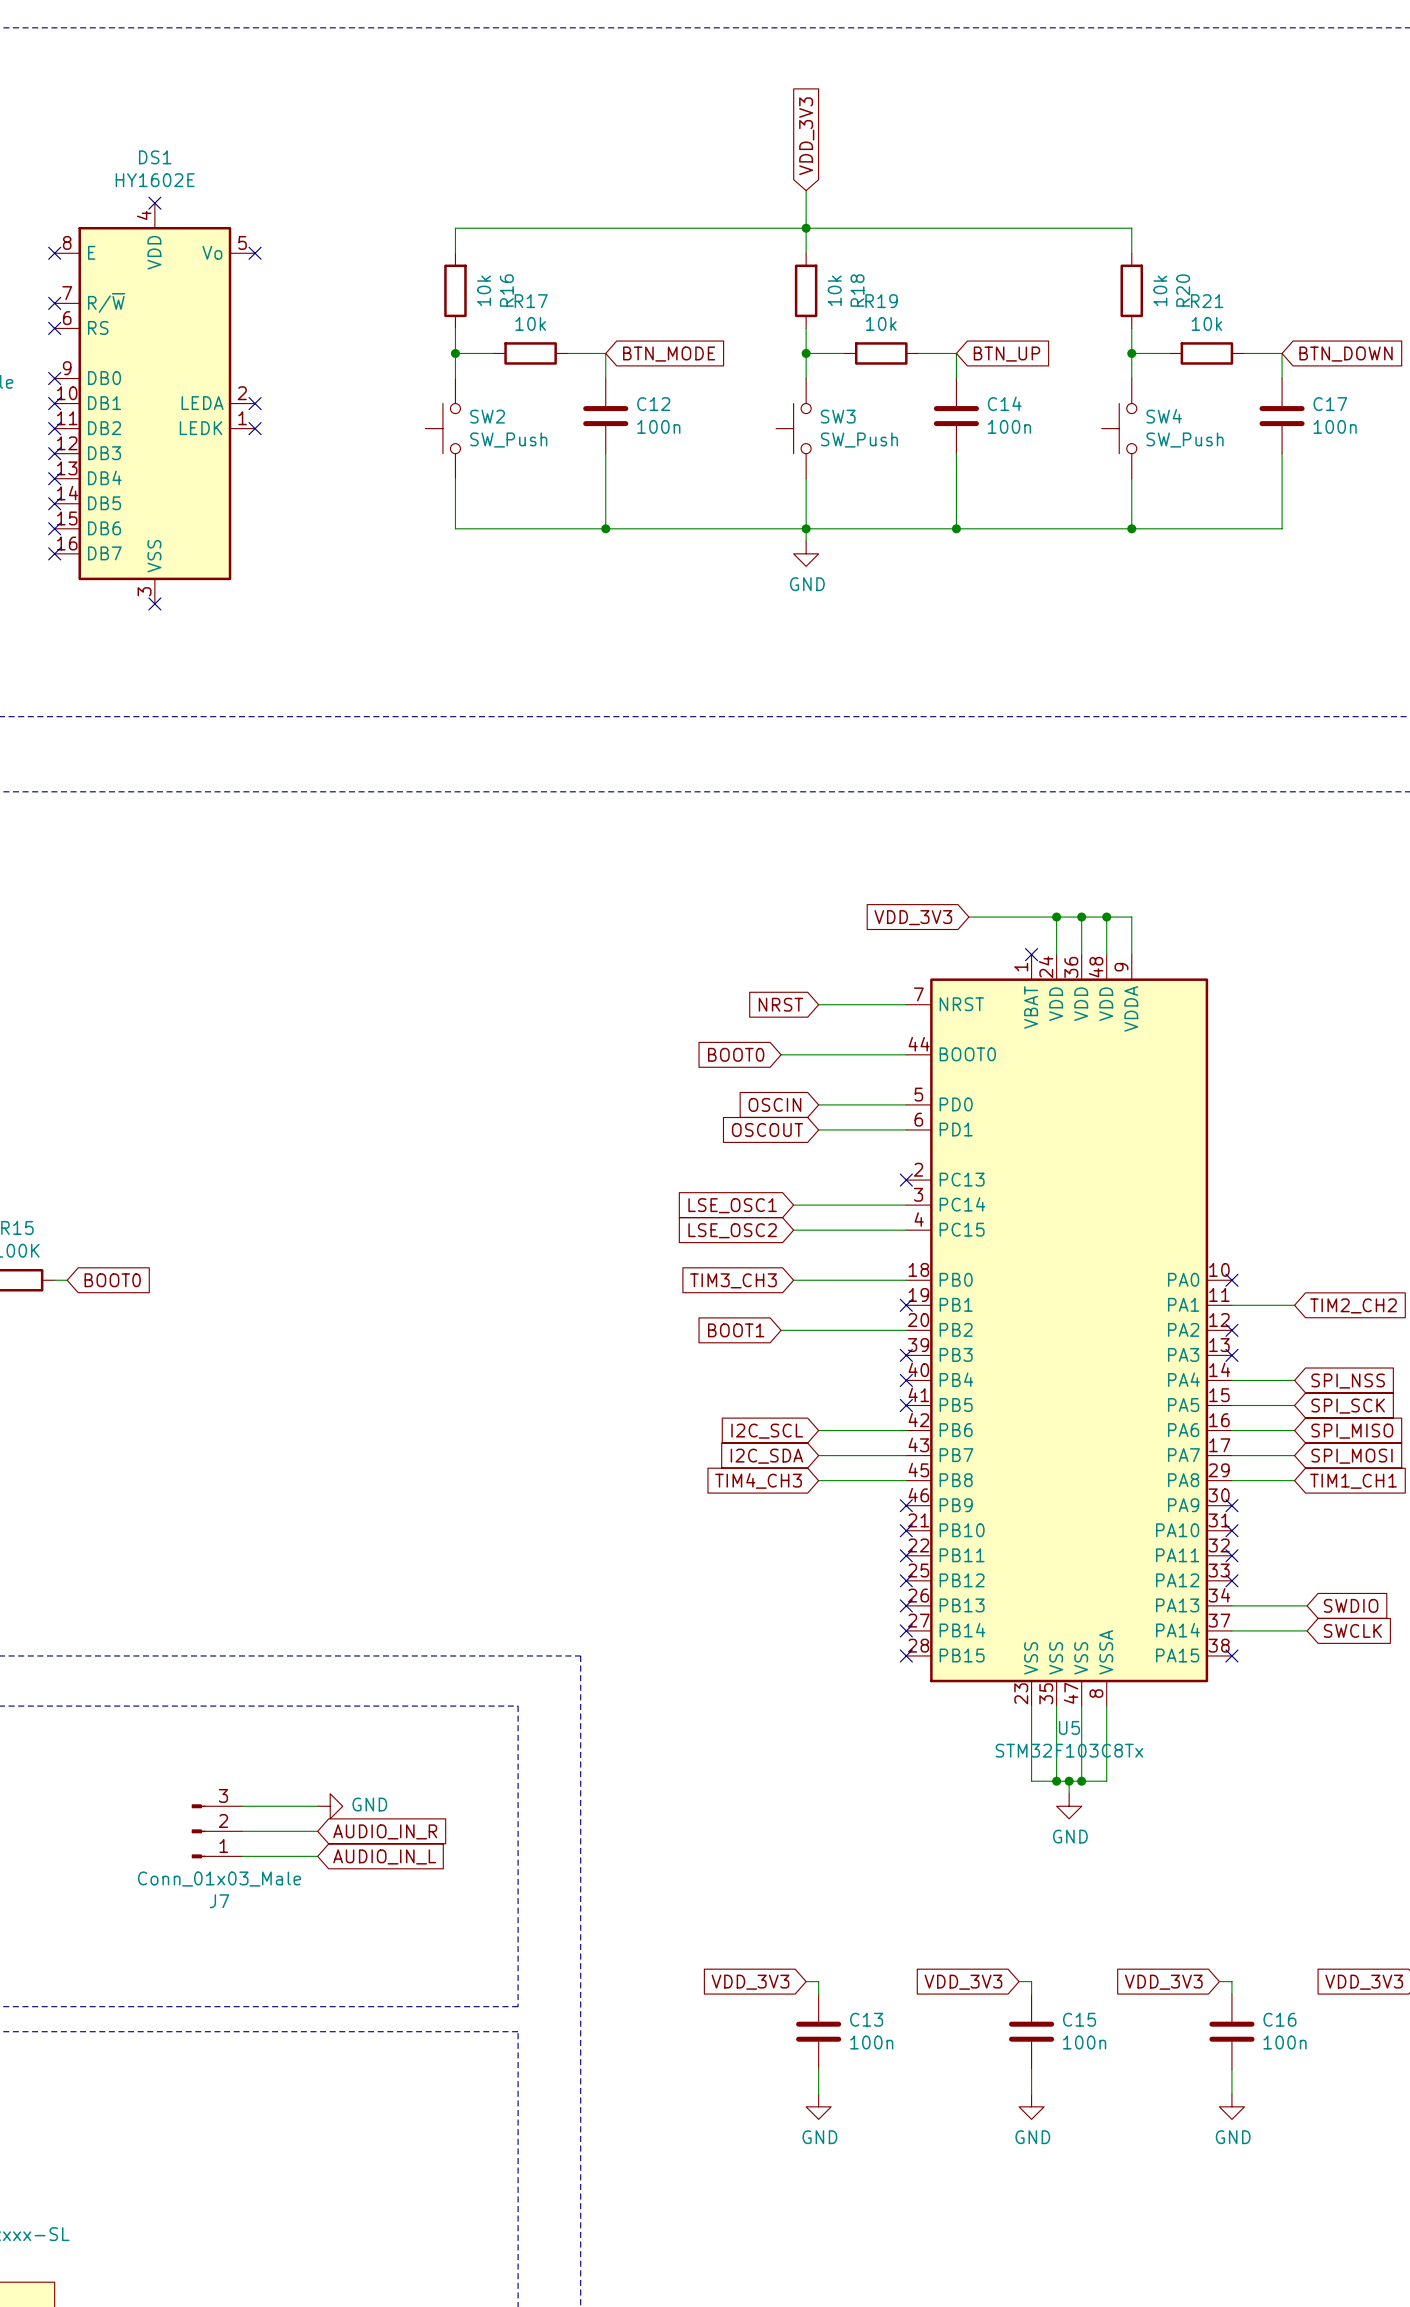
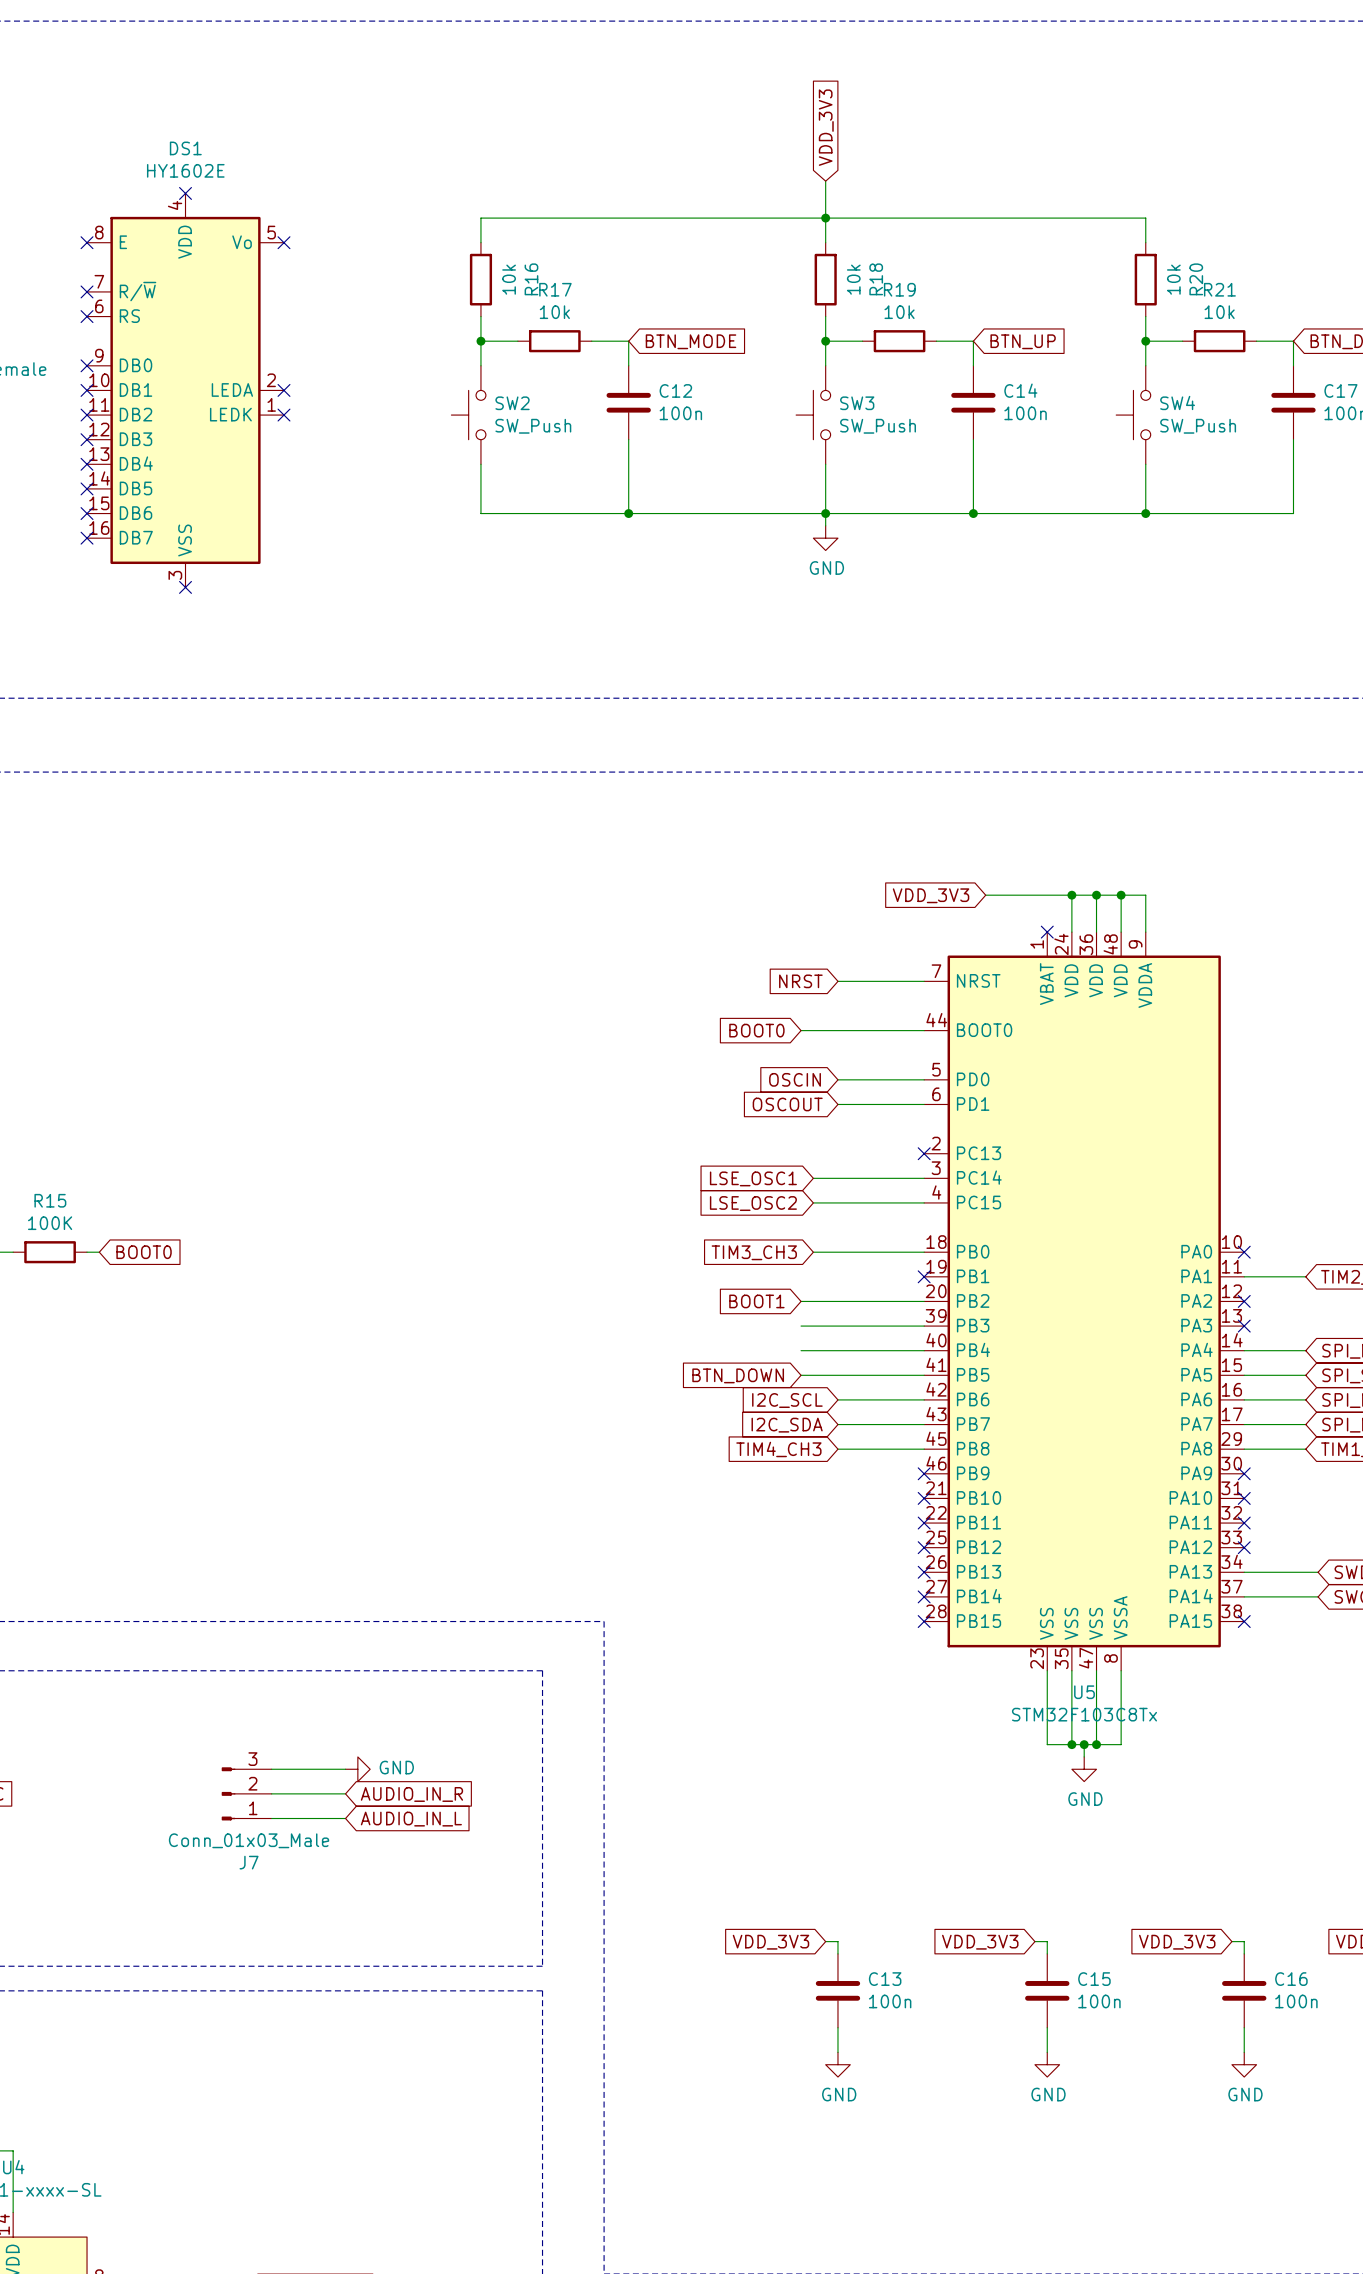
wire: none -> (801, 1326) (924, 1326)
no-connect mark: (906, 1355) -> none
wire: none -> (801, 1350) (924, 1350)
no-connect mark: (906, 1380) -> none
wire: none -> (801, 1375) (924, 1375)
no-connect mark: (906, 1405) -> none
global label: none -> BTN_DOWN (738, 1375)

